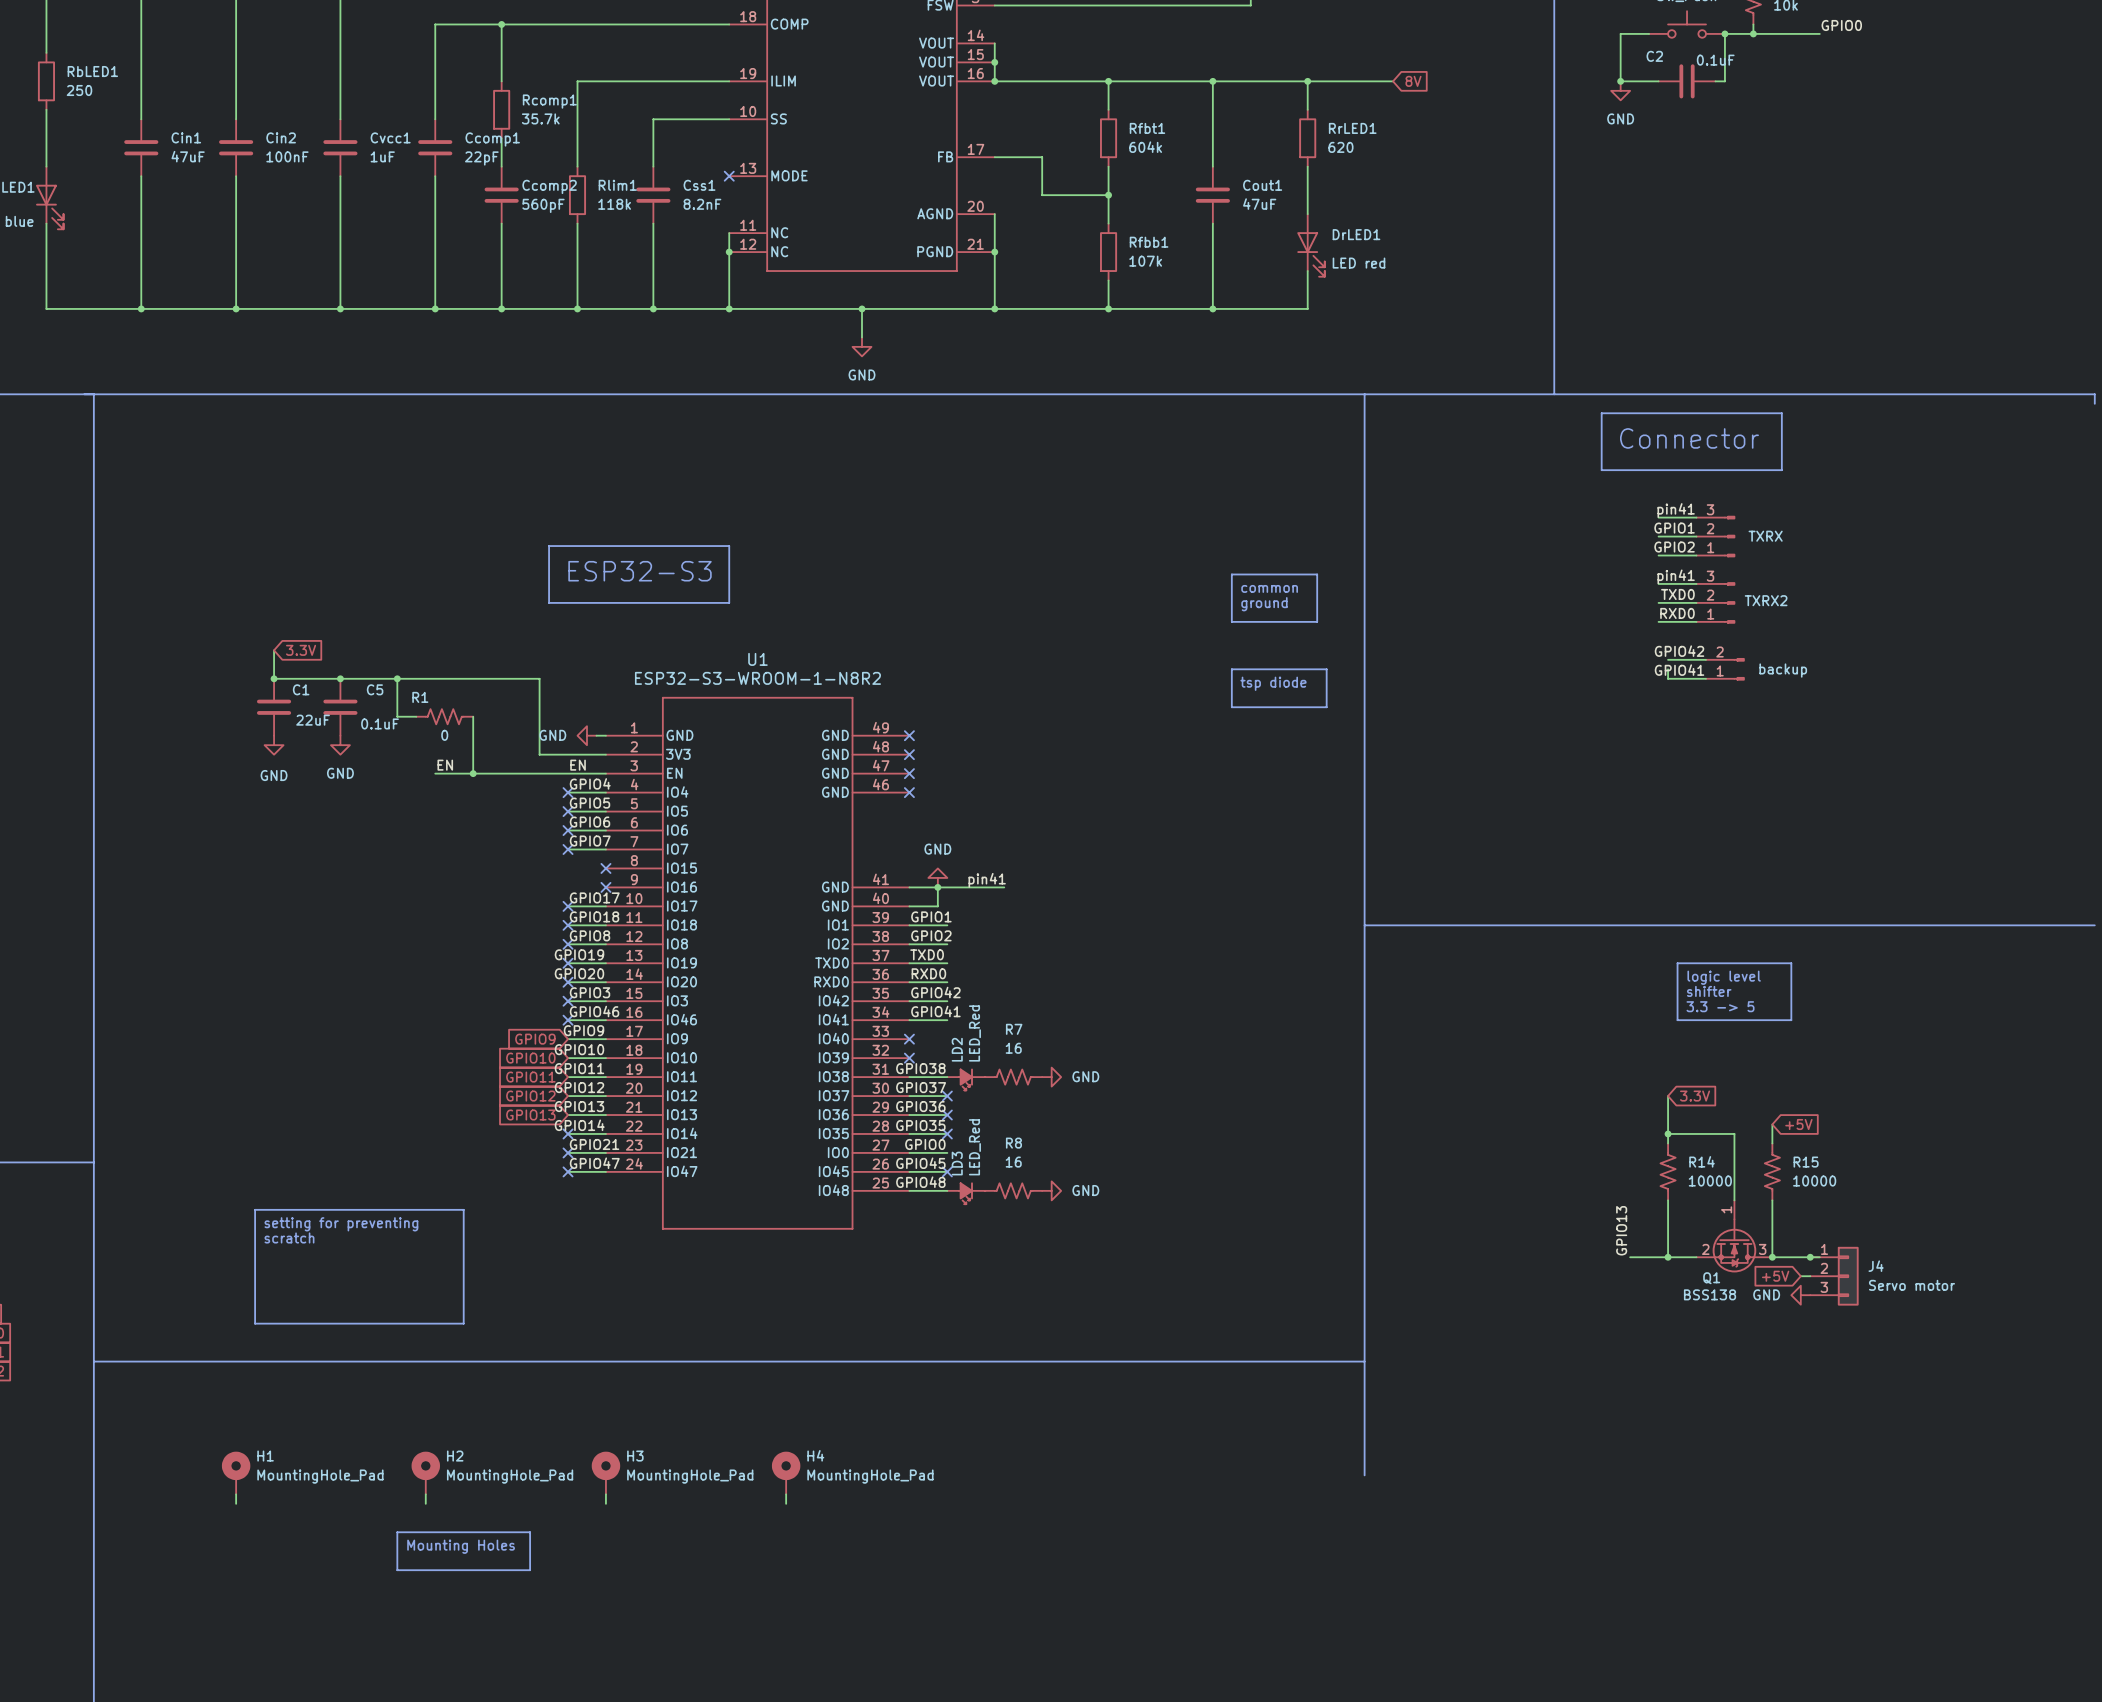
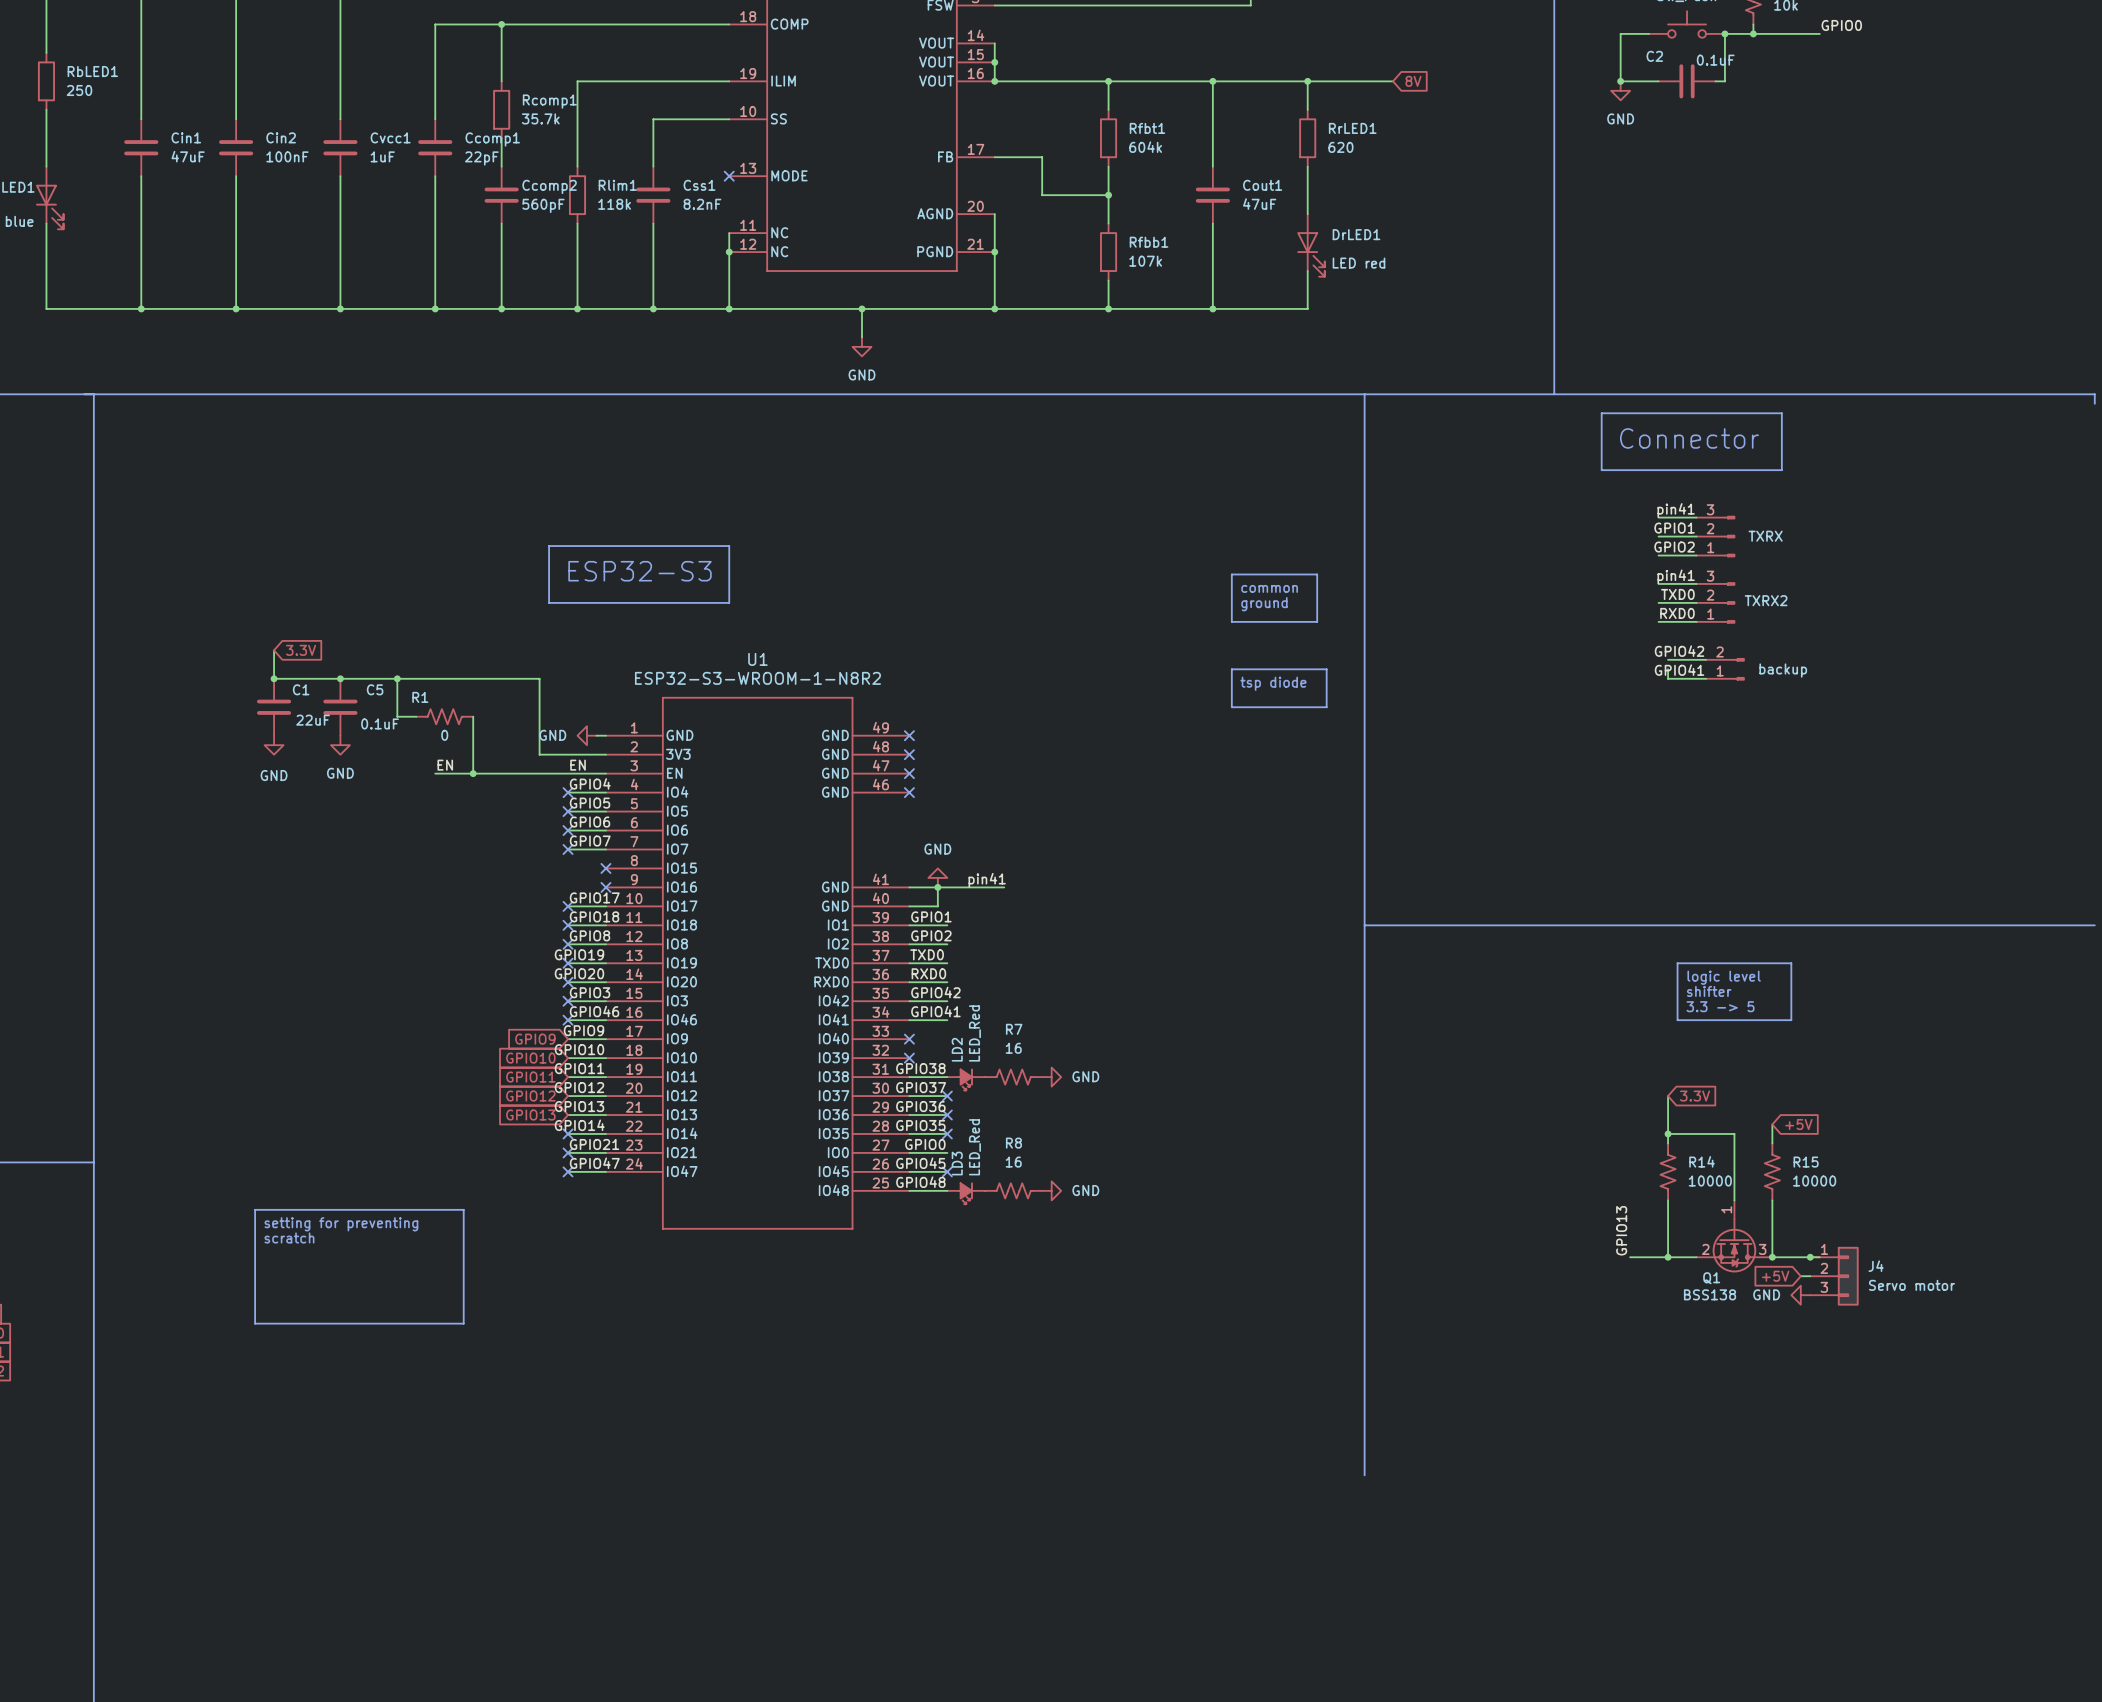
line: (93, 1361) (1364, 1361) -> none
H1: MountingHole_Pad (236, 1473) -> none
H2: MountingHole_Pad (425, 1473) -> none
H3: MountingHole_Pad (605, 1473) -> none
H4: MountingHole_Pad (786, 1473) -> none
wire: (236, 1494) (236, 1503) -> none
wire: (425, 1494) (425, 1503) -> none
wire: (605, 1494) (605, 1503) -> none
wire: (786, 1494) (786, 1503) -> none
line: (397, 1532) (530, 1532) (530, 1570) (397, 1570) (397, 1532) -> none
text: Mounting Holes (461, 1546) -> none

